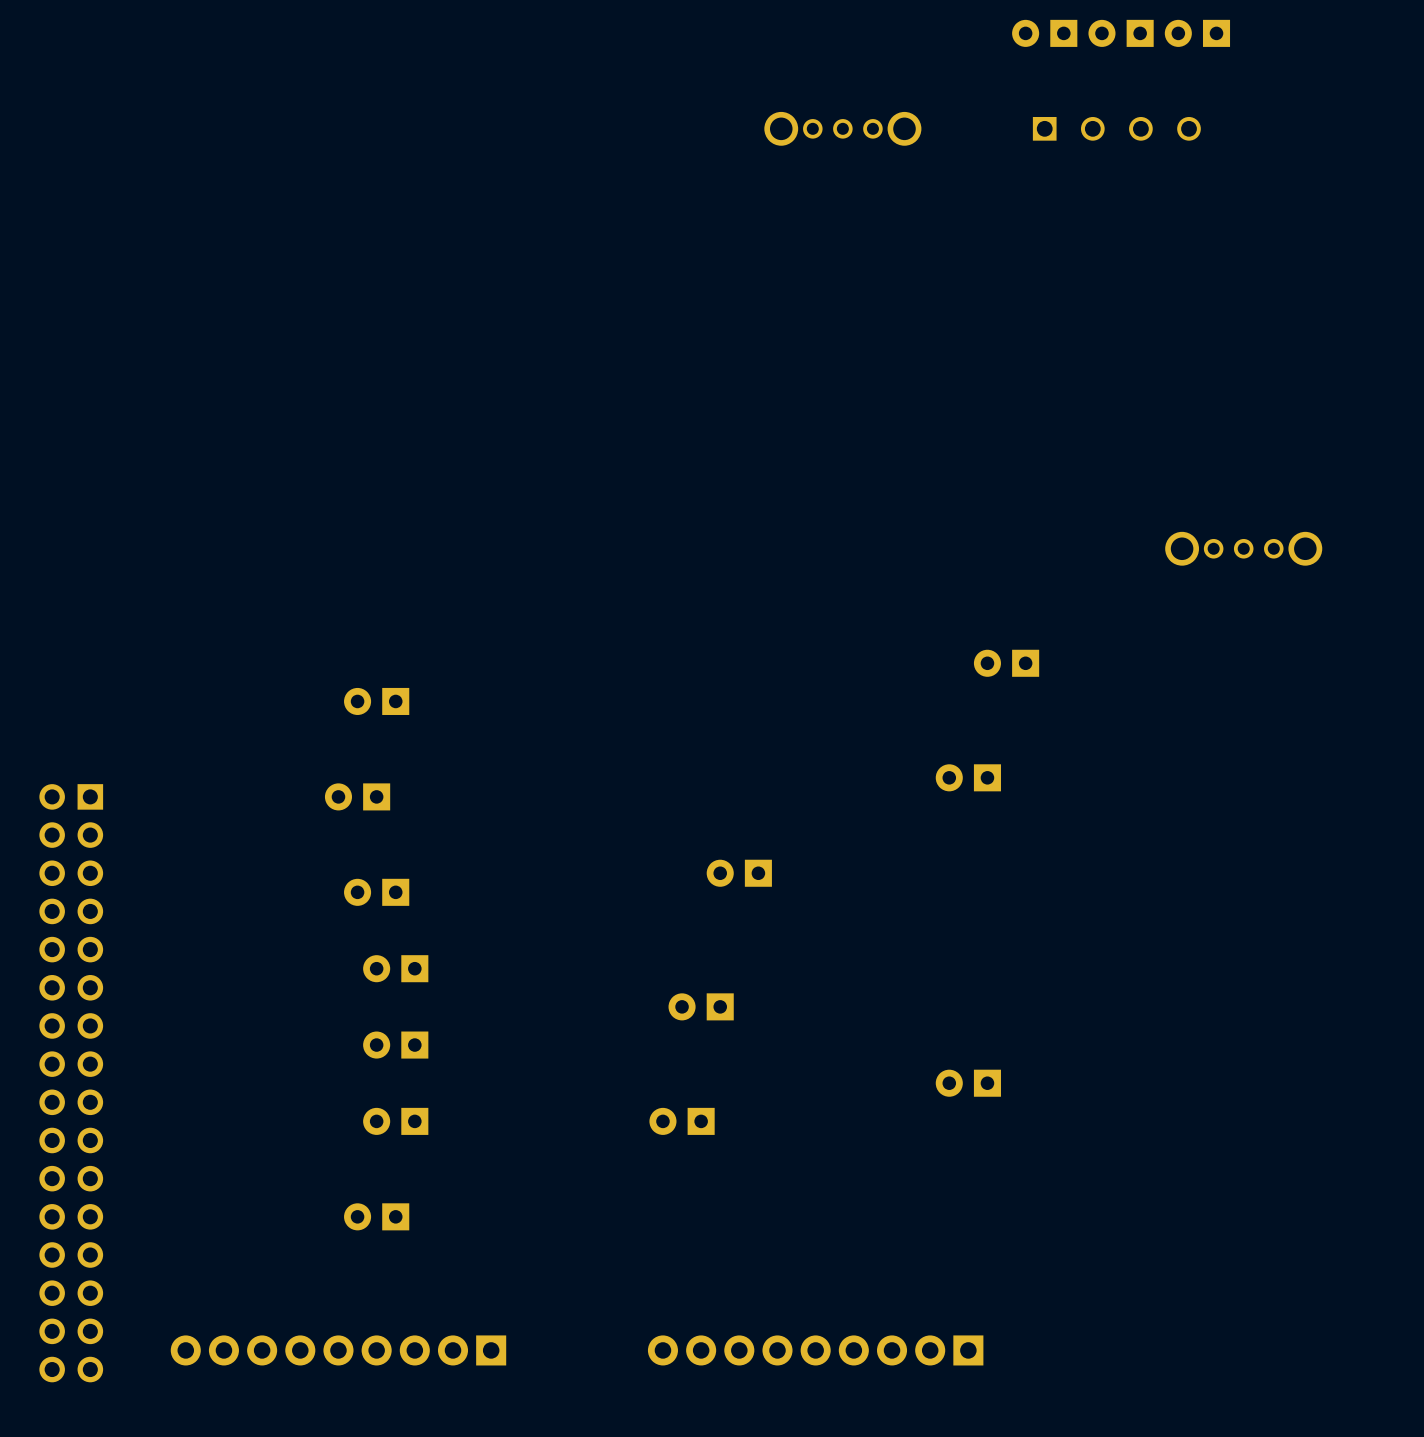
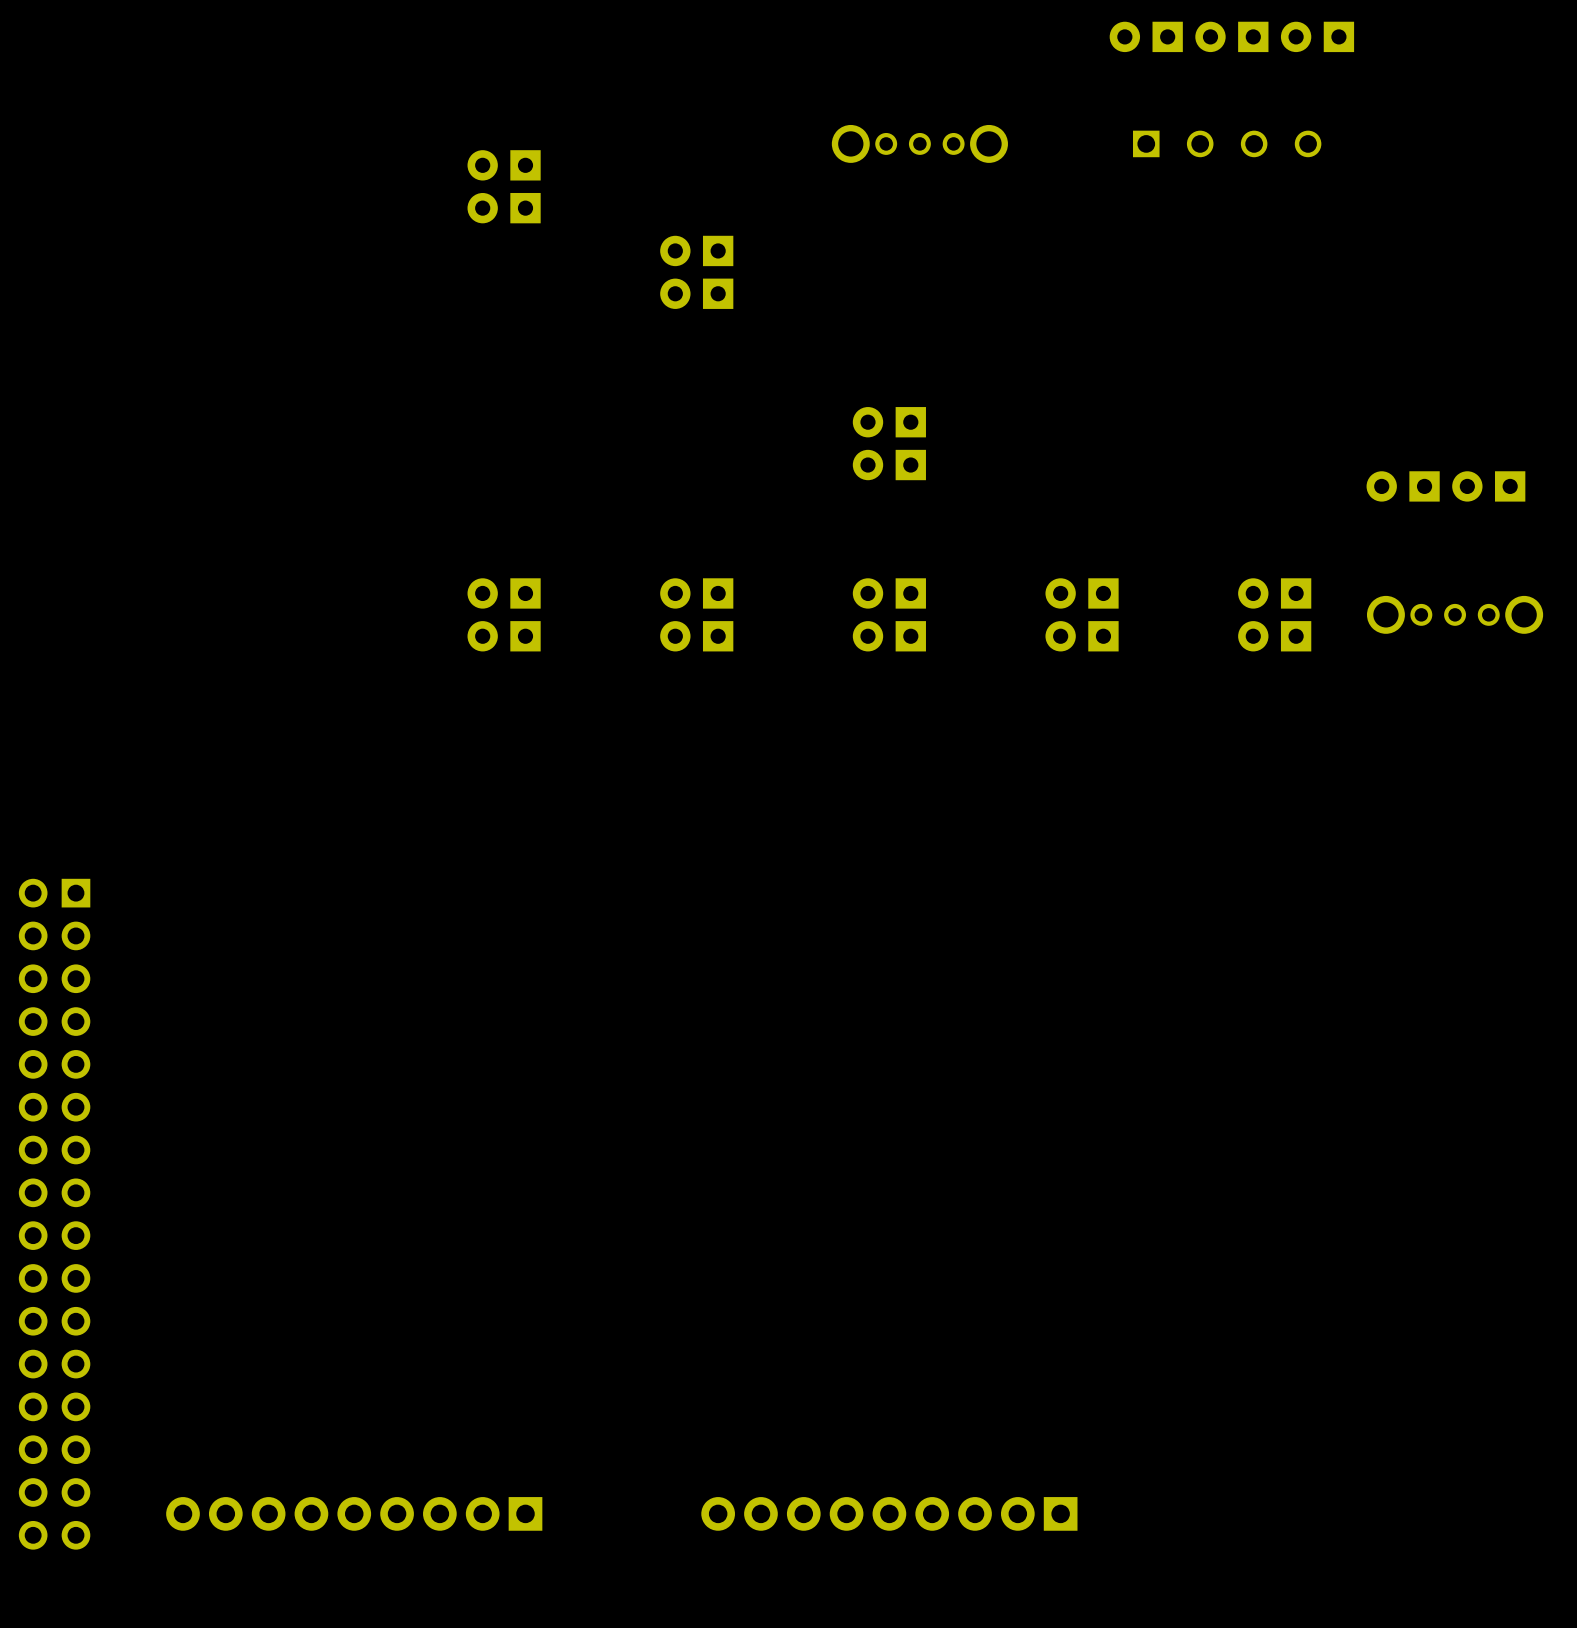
part: none -> (504, 165)
part: none -> (504, 208)
part: none -> (696, 250)
part: none -> (696, 293)
part: none -> (889, 422)
part: none -> (889, 465)
part: none -> (1403, 486)
part: none -> (1488, 486)
part: none -> (504, 593)
part: none -> (696, 593)
part: none -> (889, 593)
part: none -> (1082, 593)
part: none -> (1274, 593)
part position: (1243, 548) -> (1455, 614)
part: none -> (504, 636)
part: none -> (696, 636)
part: none -> (889, 636)
part: none -> (1082, 636)
part: none -> (1274, 636)
part: (1006, 663) -> none
part: (376, 701) -> none
part: (968, 777) -> none
part: (357, 796) -> none
part: (739, 873) -> none
part: (376, 892) -> none
part: (395, 968) -> none
part: (701, 1006) -> none
part: (395, 1045) -> none
part: (968, 1083) -> none
part: (395, 1121) -> none
part: (682, 1121) -> none
part: (376, 1216) -> none

